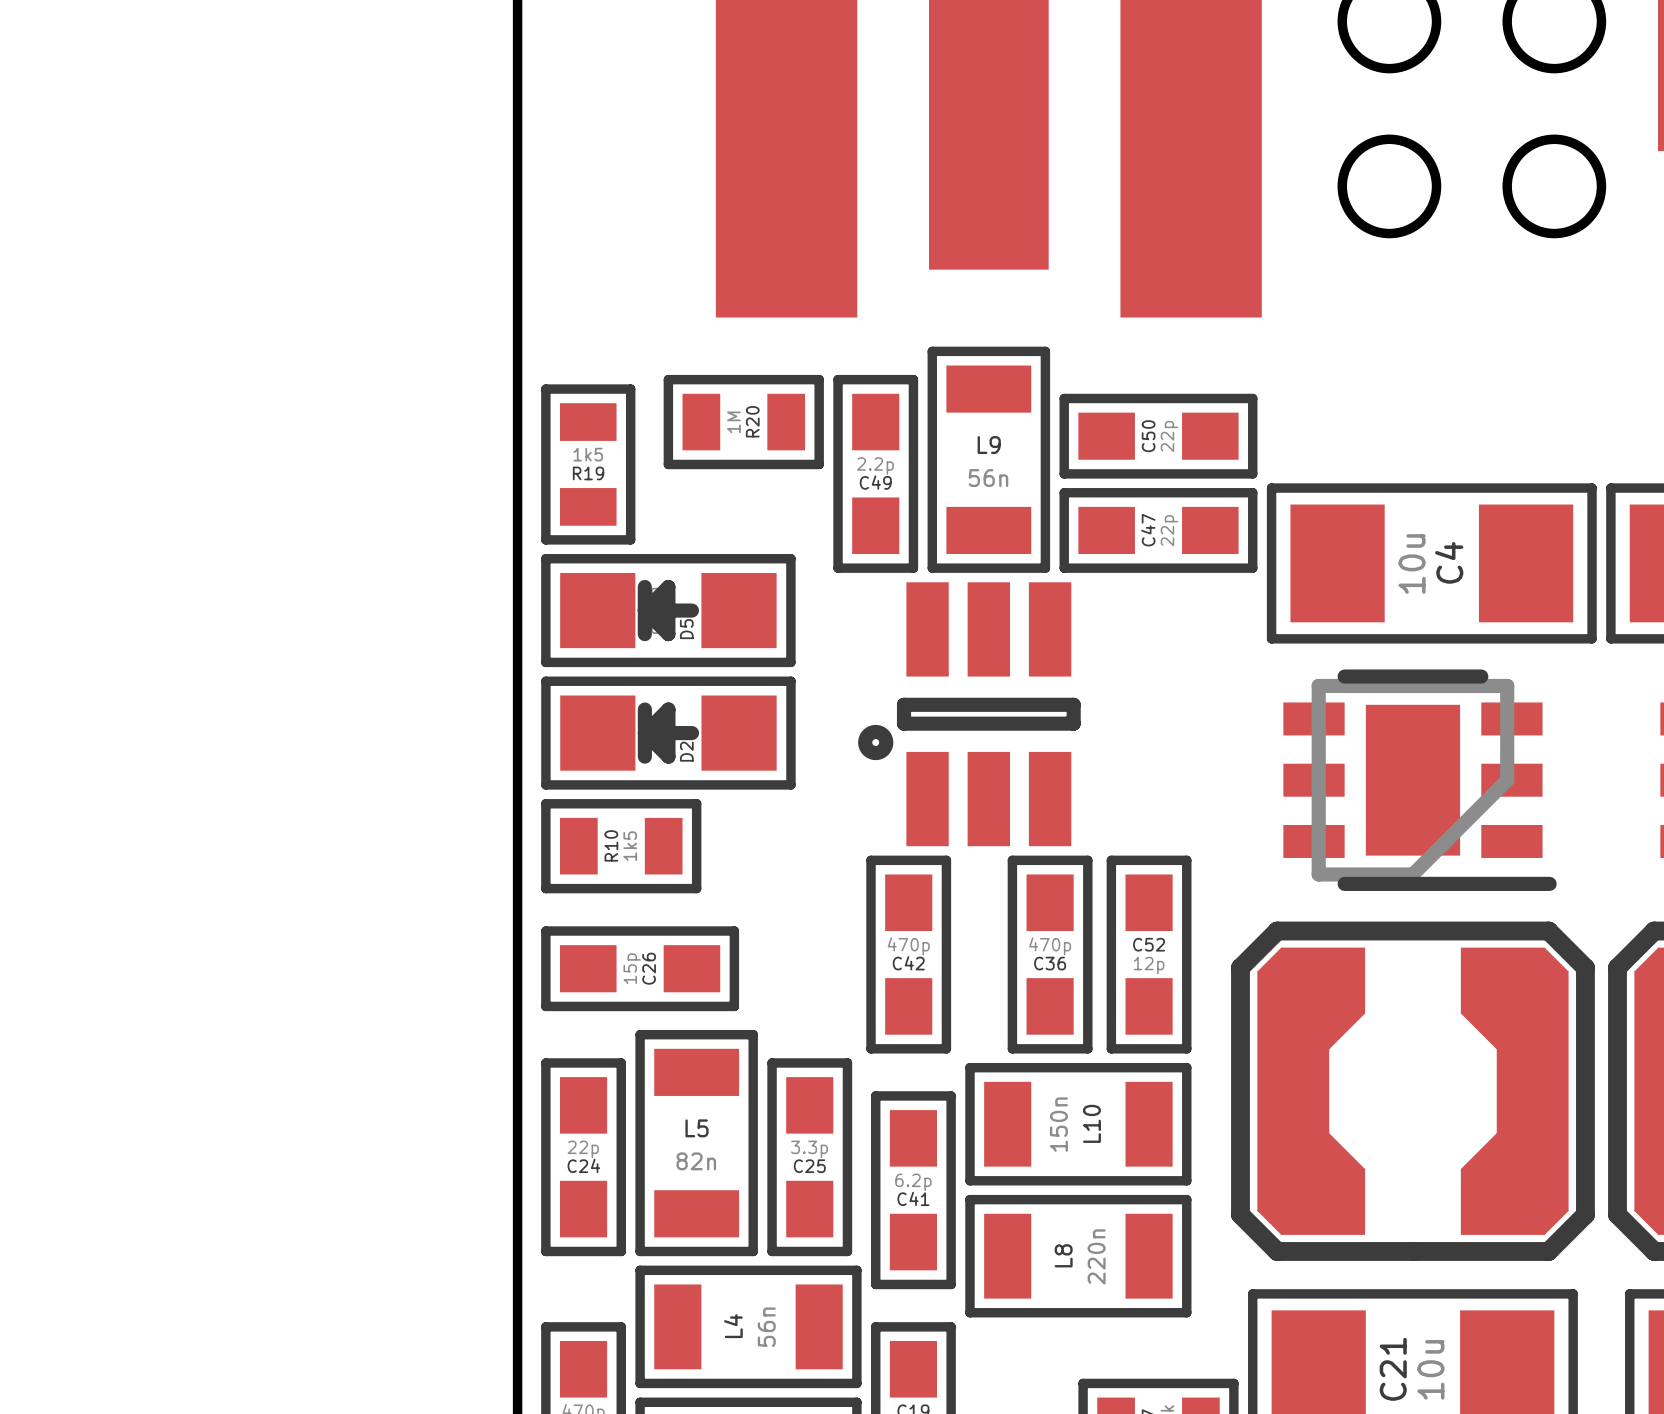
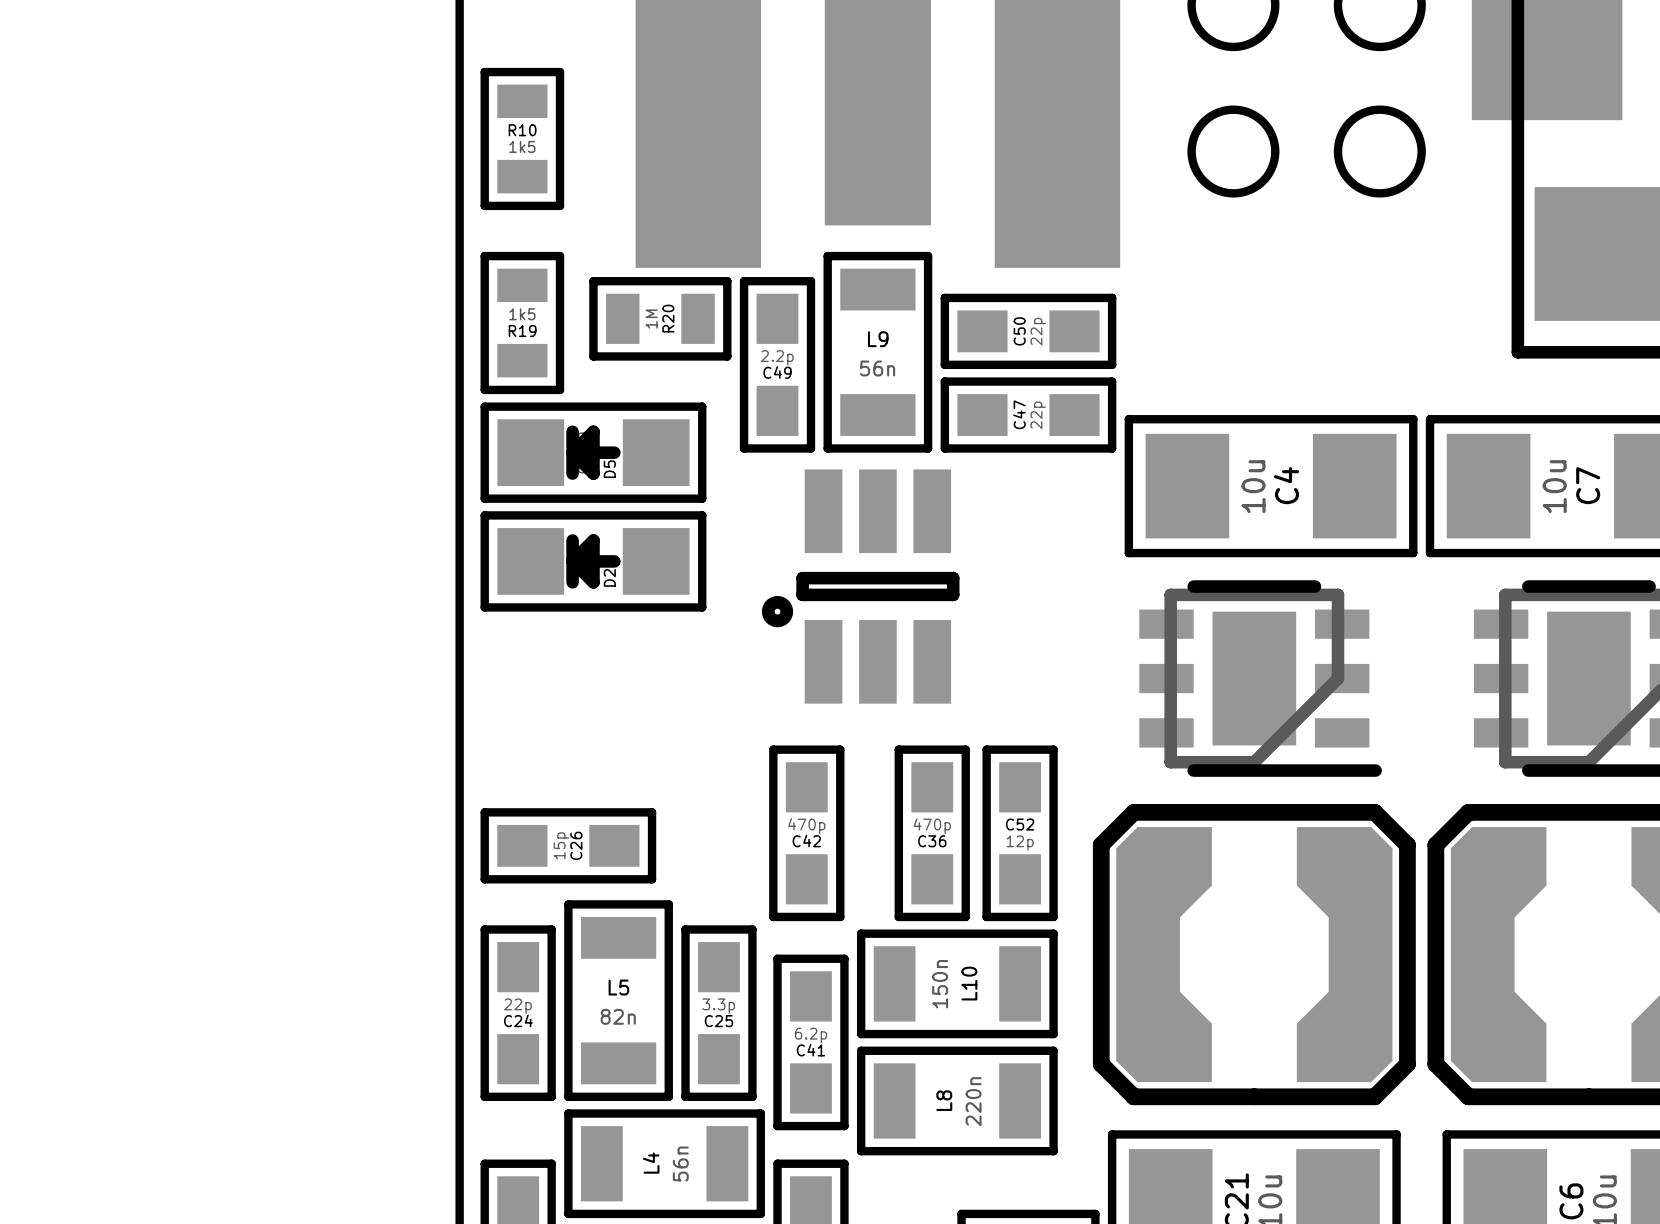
R20 position: (743, 422) -> (660, 318)
C50 position: (1158, 436) -> (1028, 331)
L9 position: (988, 459) -> (877, 352)
R19 position: (588, 464) -> (522, 323)
C49 position: (875, 473) -> (777, 364)
C47 position: (1158, 530) -> (1028, 415)
D5 position: (668, 610) -> (593, 452)
part position: (969, 714) -> (860, 586)
D2 position: (668, 733) -> (593, 561)
R10 rotation: 0° (621, 846) -> 90° clockwise (522, 138)
R10 position: (621, 846) -> (522, 138)

